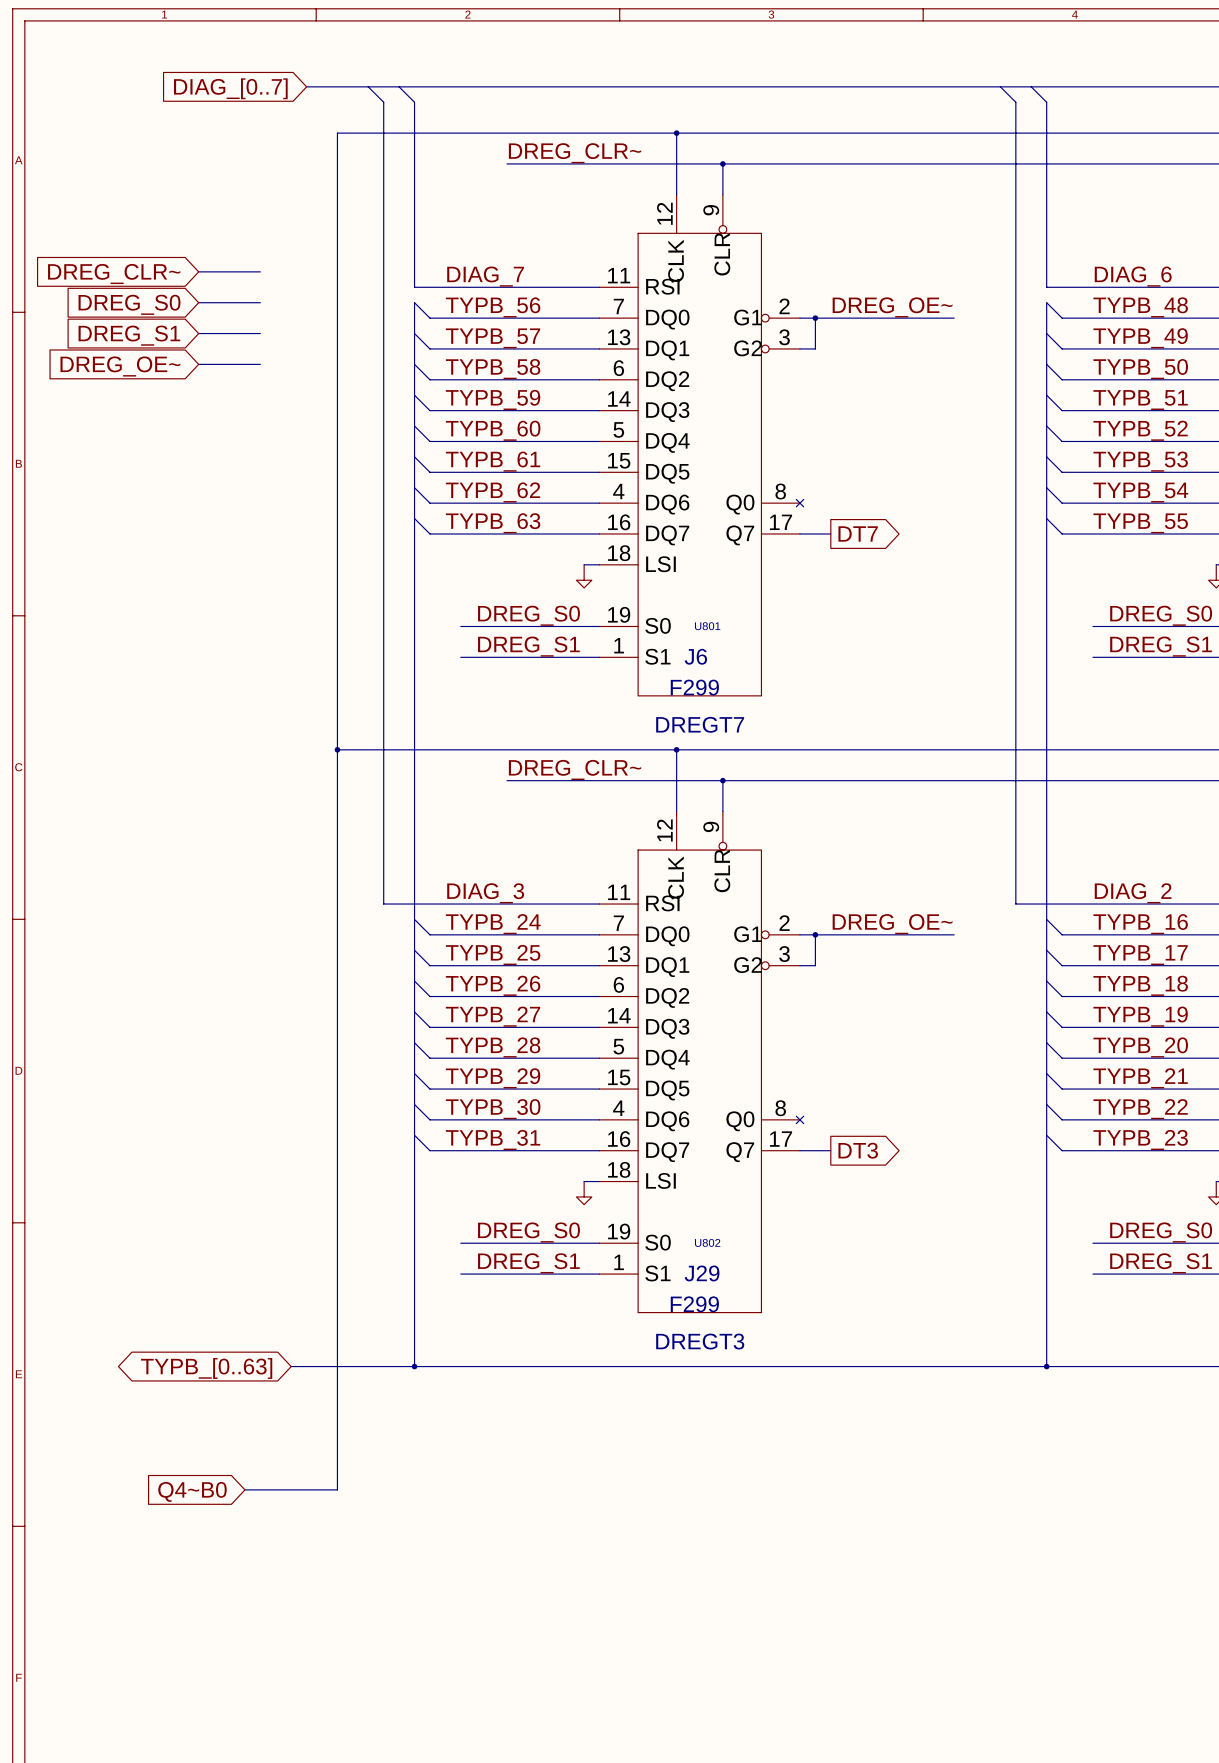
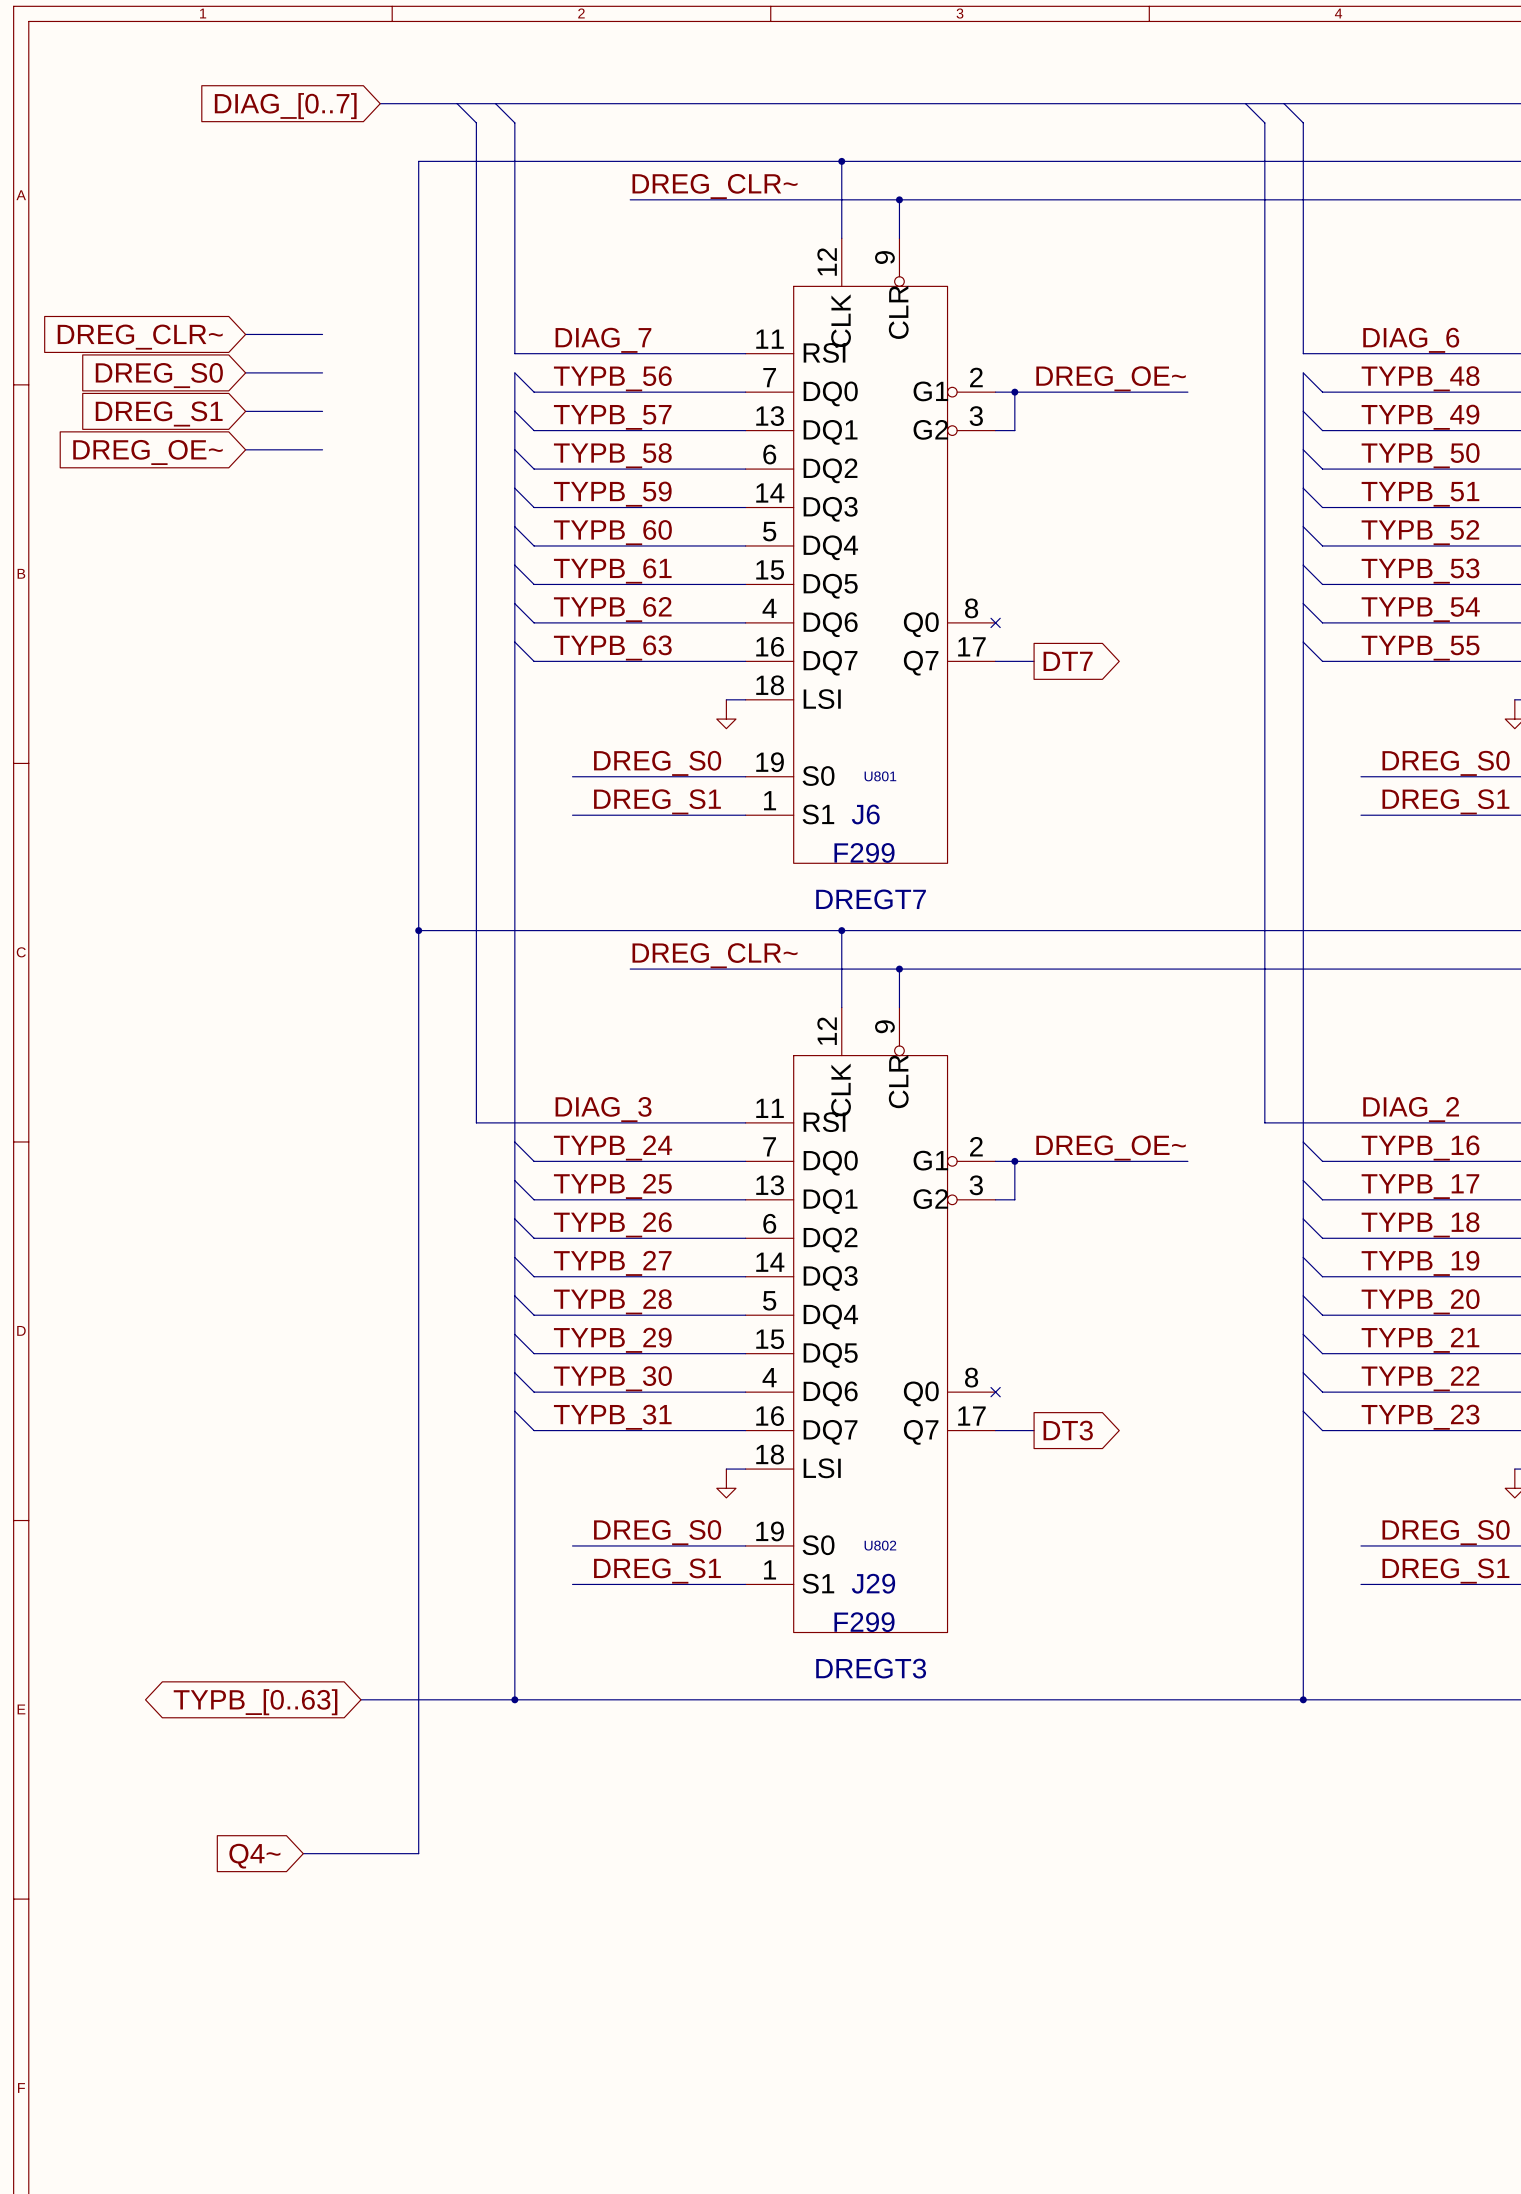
global label: Q4~B0 (192, 1491) -> Q4~ (254, 1856)

